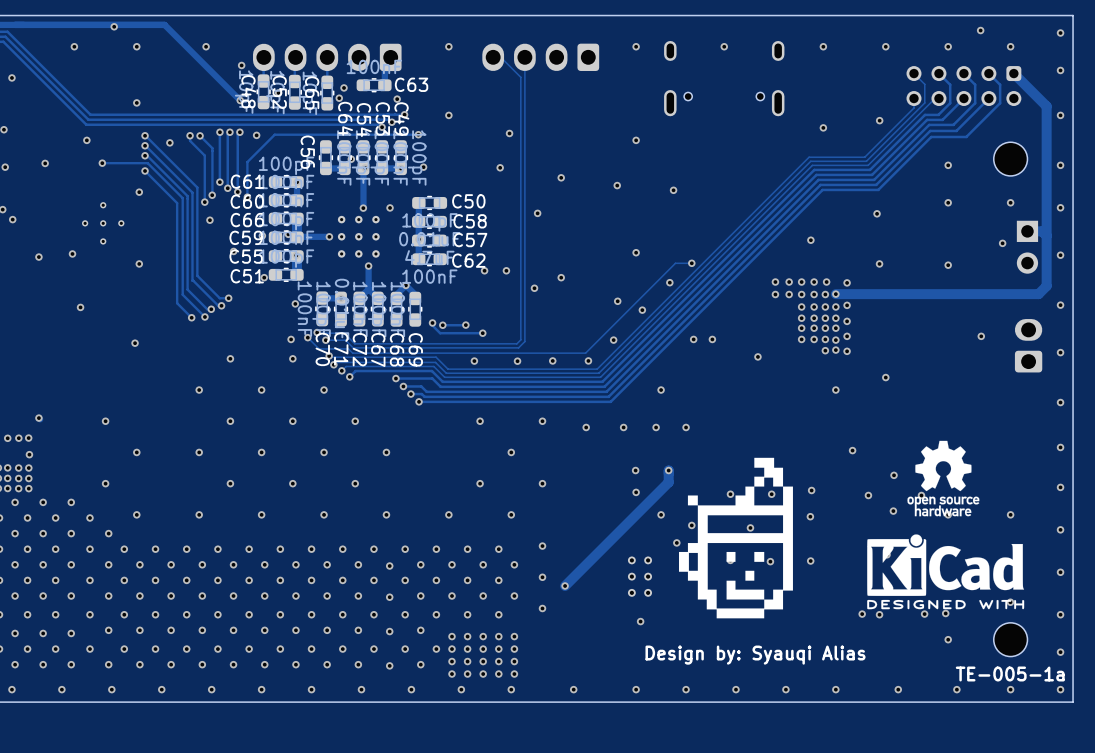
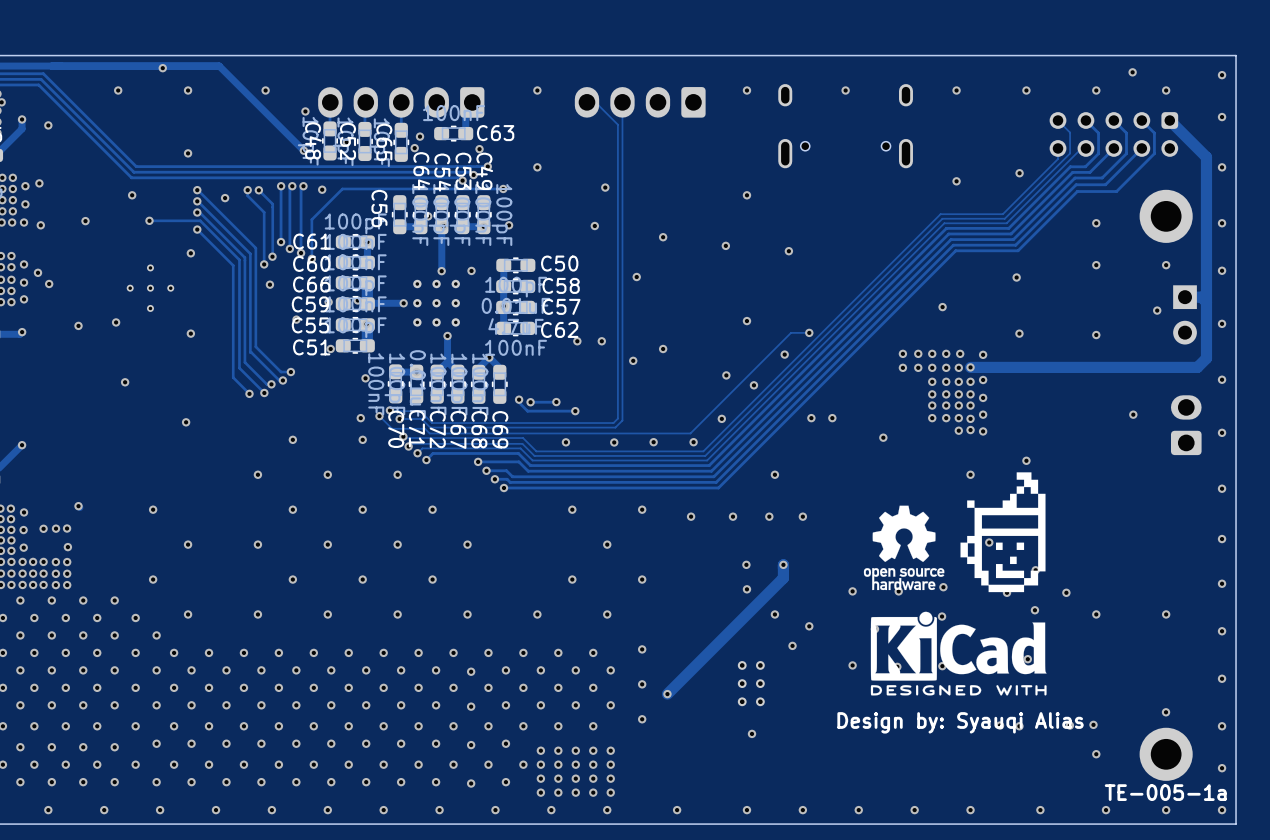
part footprint: [993, 142, 1028, 176] -> [1139, 189, 1193, 243]
drawing: none -> [960, 472, 1046, 593]
drawing: [679, 457, 793, 619] -> none
drawing position: (943, 478) -> (904, 547)
drawing position: (945, 571) -> (958, 653)
part footprint: [993, 622, 1028, 657] -> [1139, 727, 1193, 781]
text position: Design by: Syauqi Alias (755, 655) -> Design by: Syauqi Alias (960, 722)

